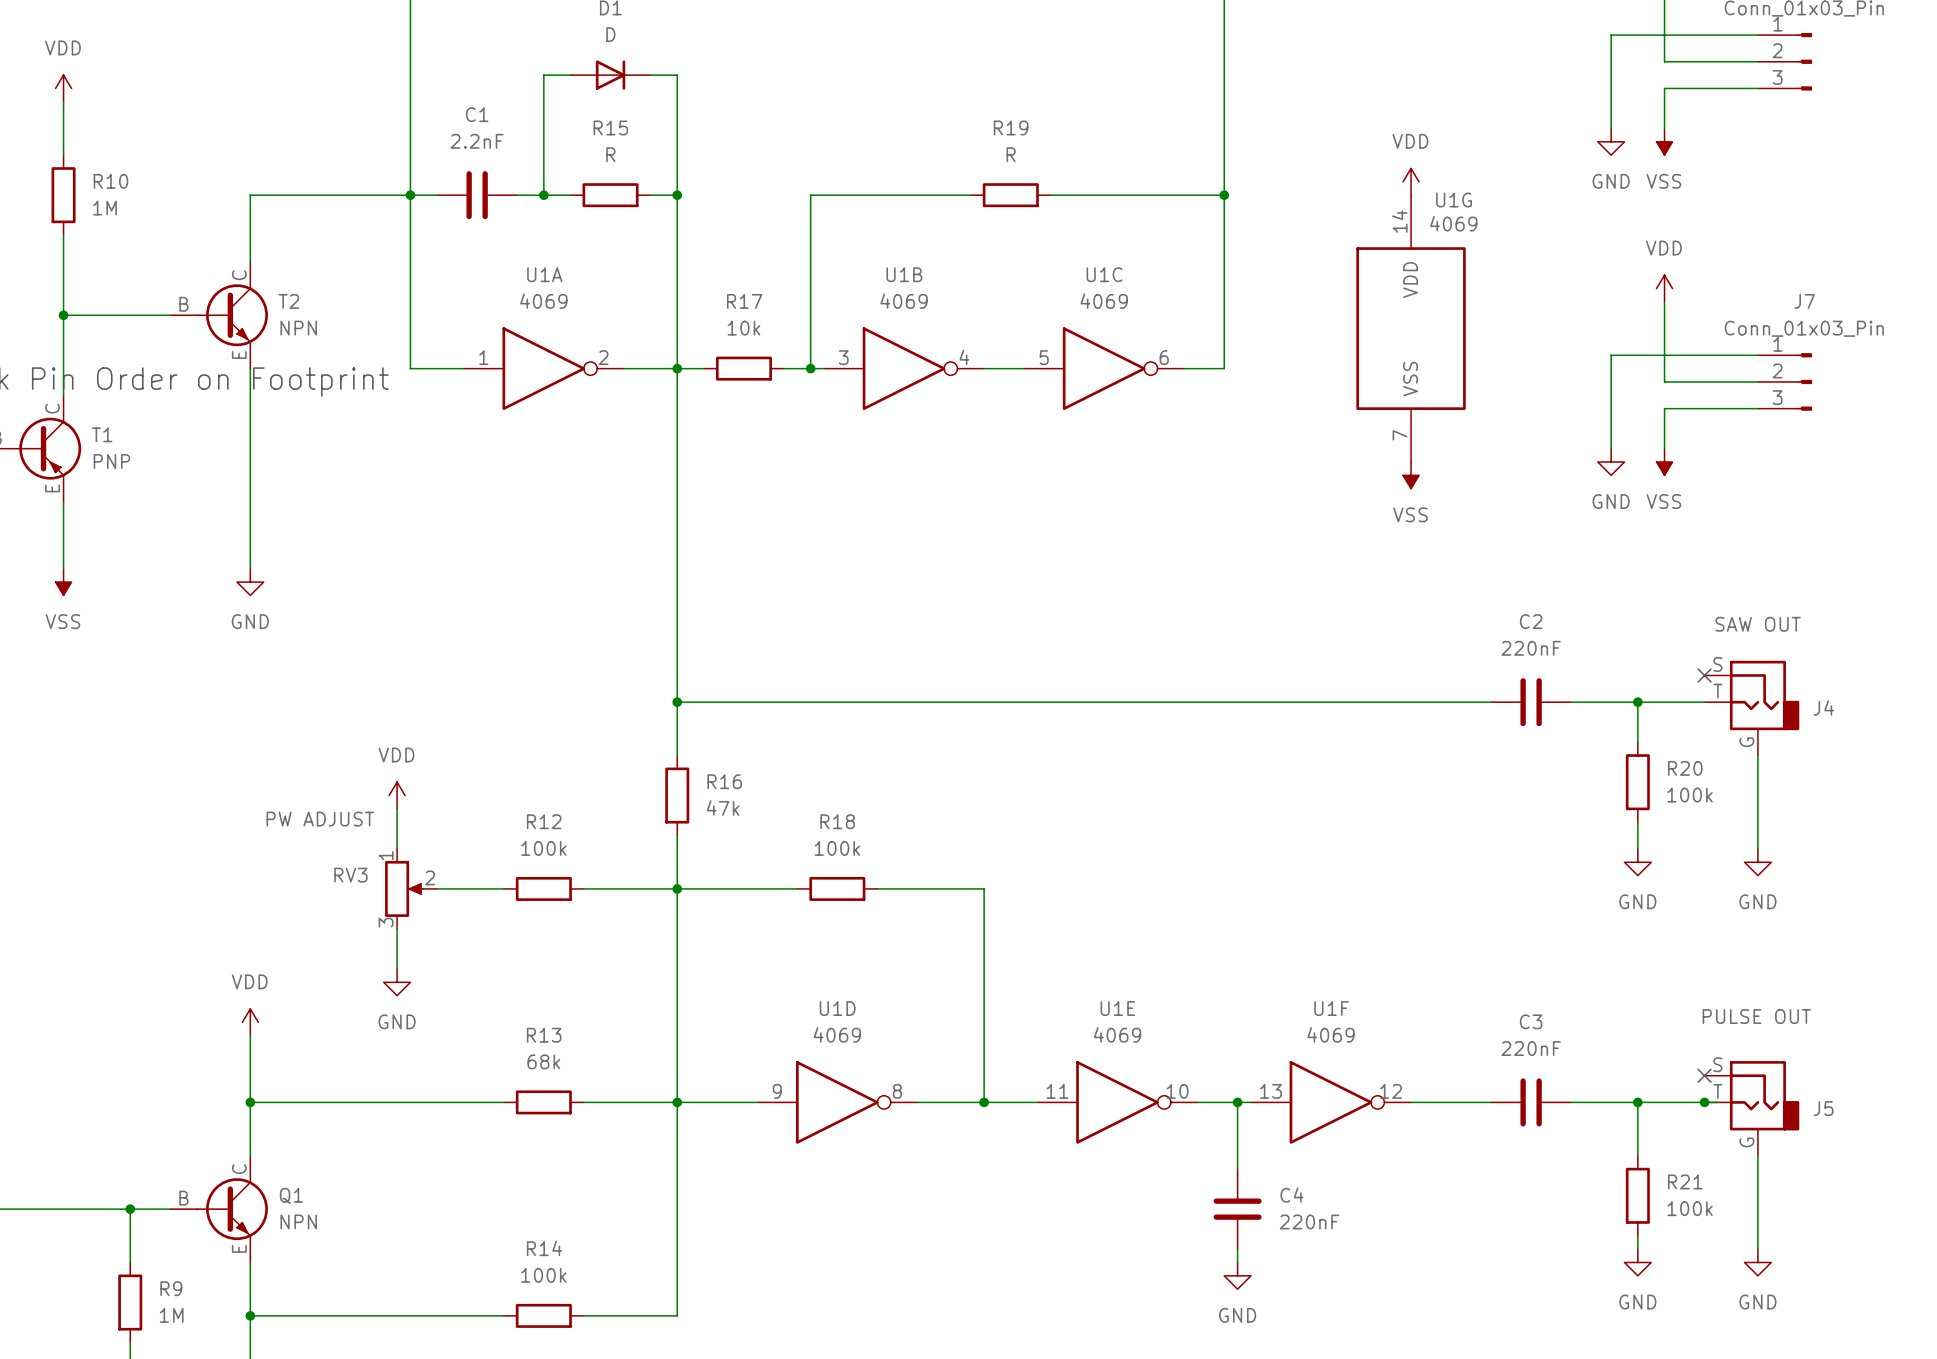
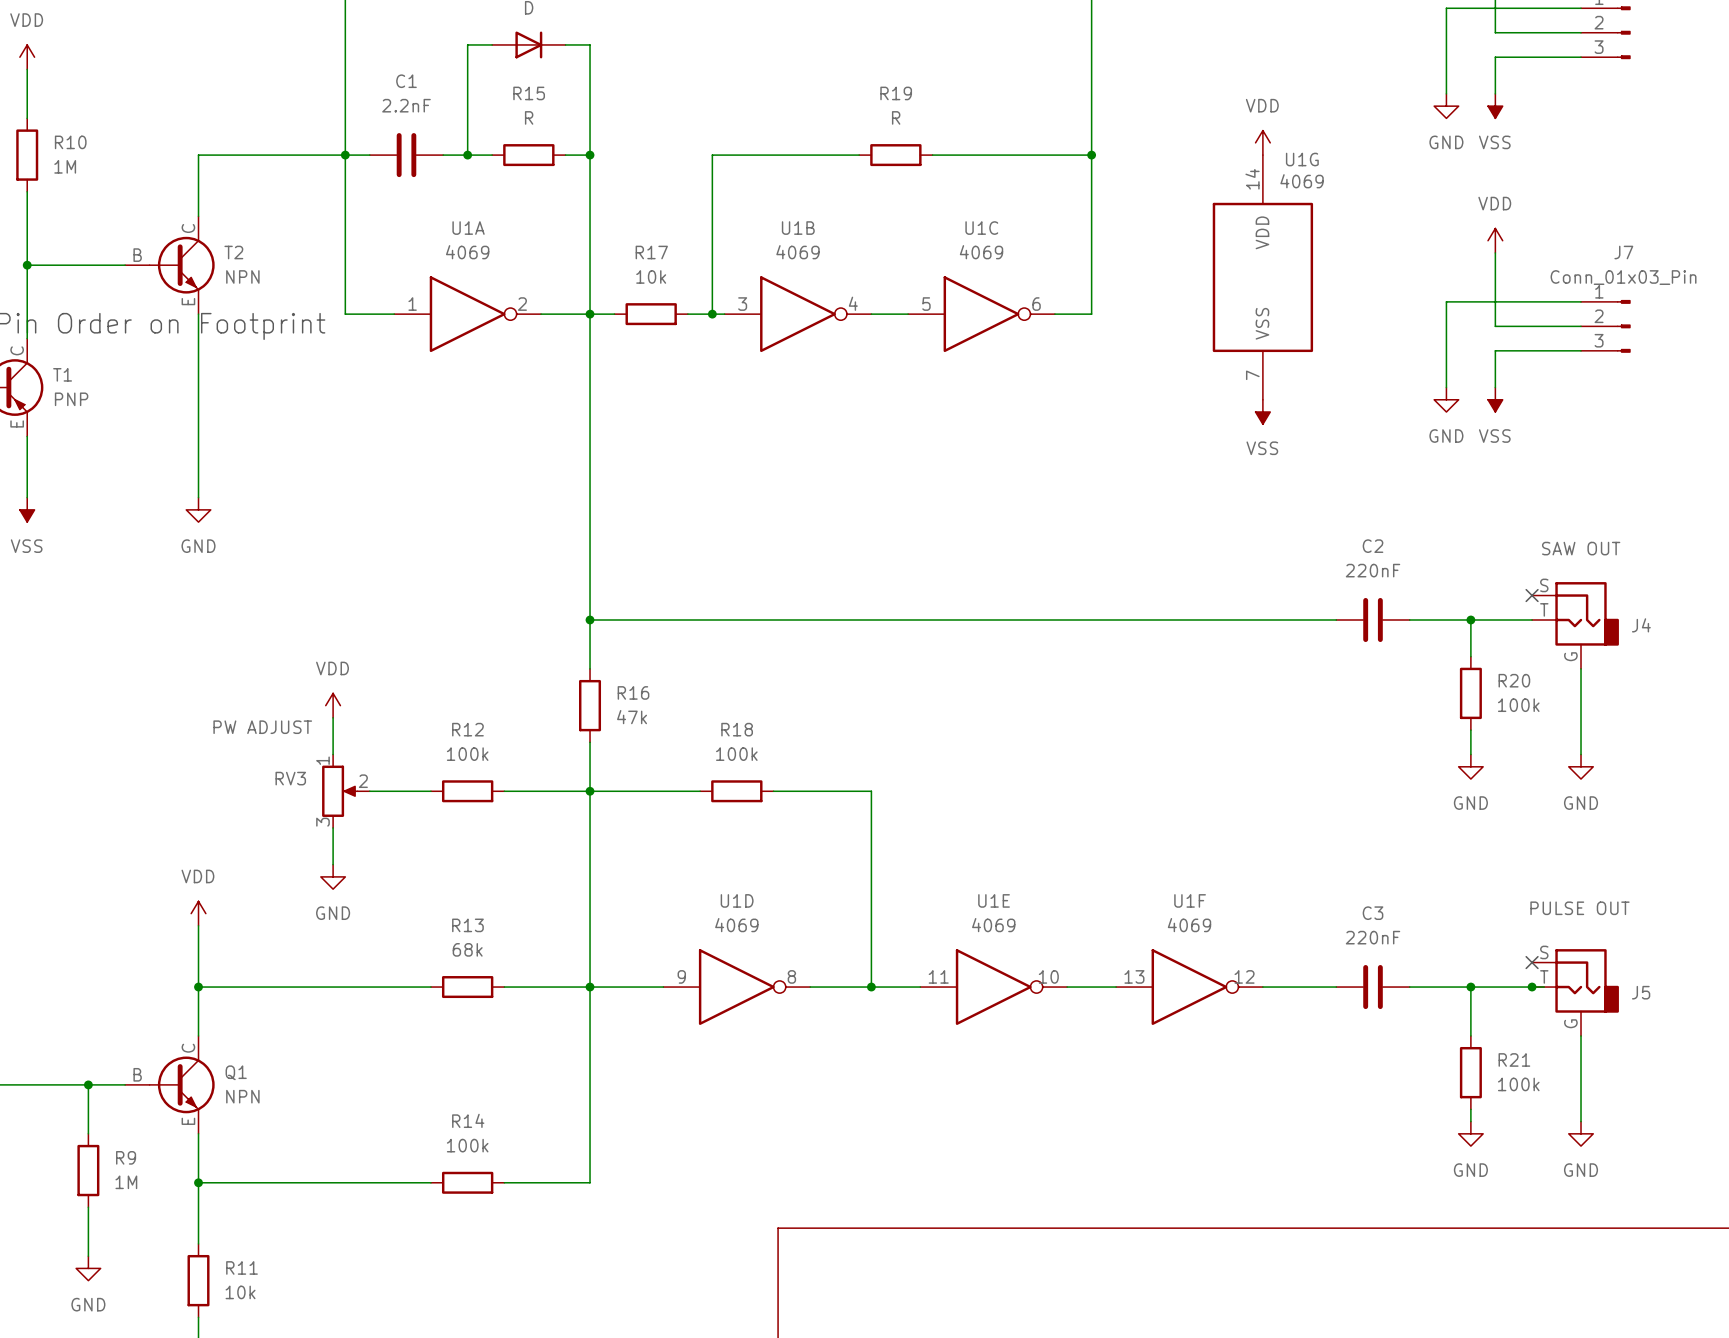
wire: (1237, 1102) (1237, 1169) -> none
junction: (1237, 1102) -> none
C4: 220nF (1237, 1209) -> none
wire: (1237, 1249) (1237, 1262) -> none
power symbol: GND (1237, 1275) -> none

